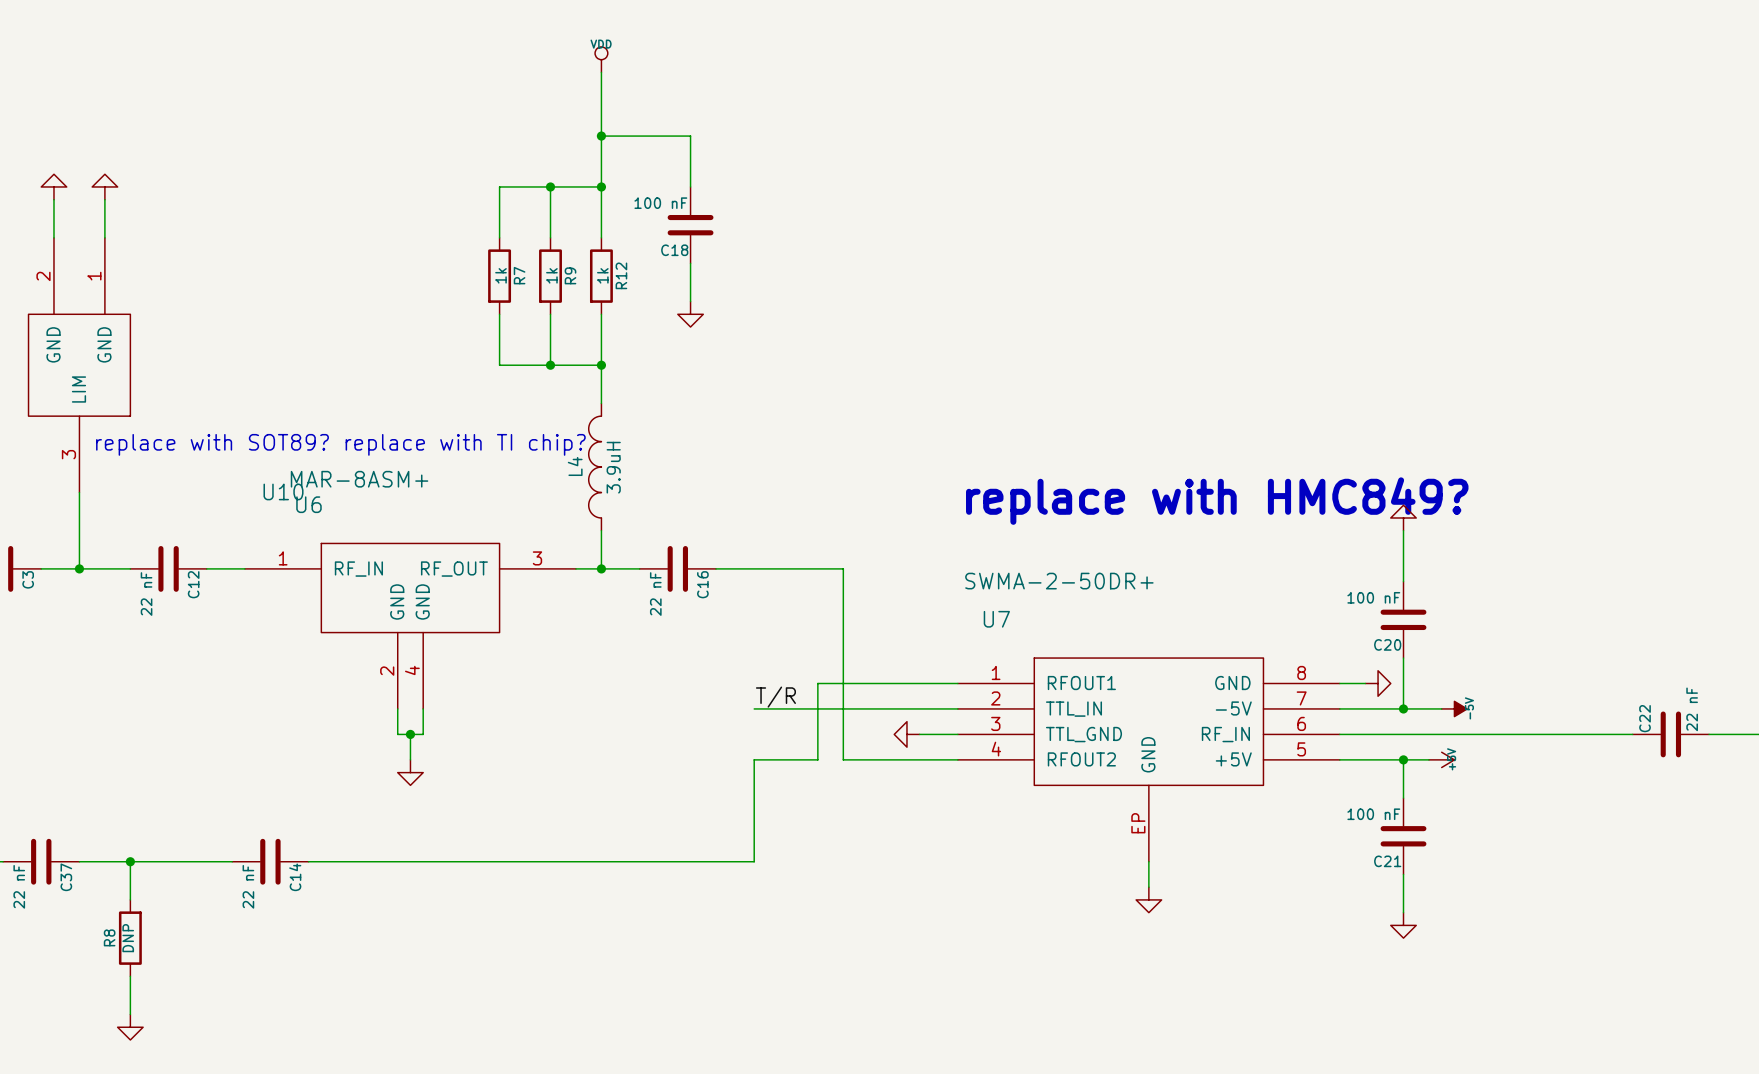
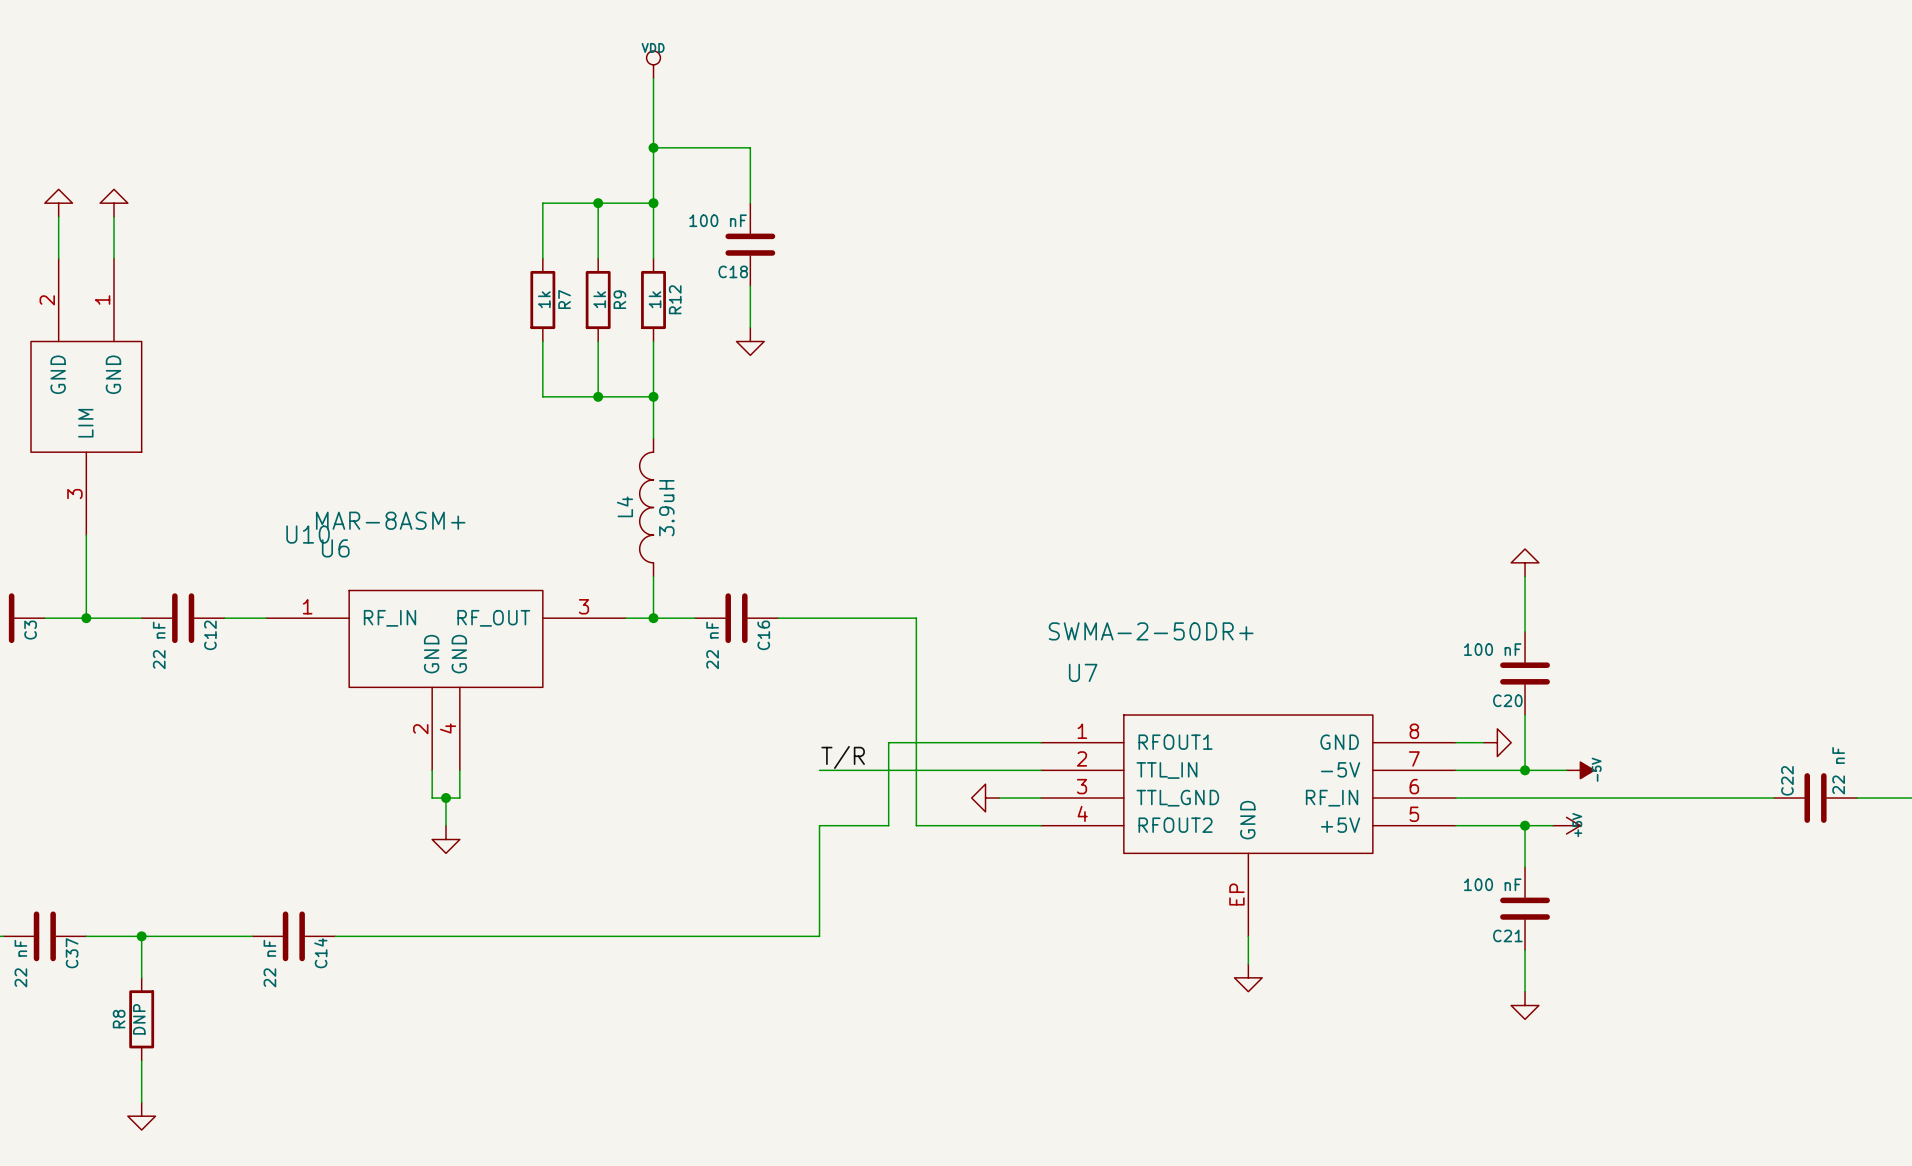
text: replace with SOT89? replace with TI chip? (340, 444) -> none
text: replace with HMC849? (1217, 501) -> none

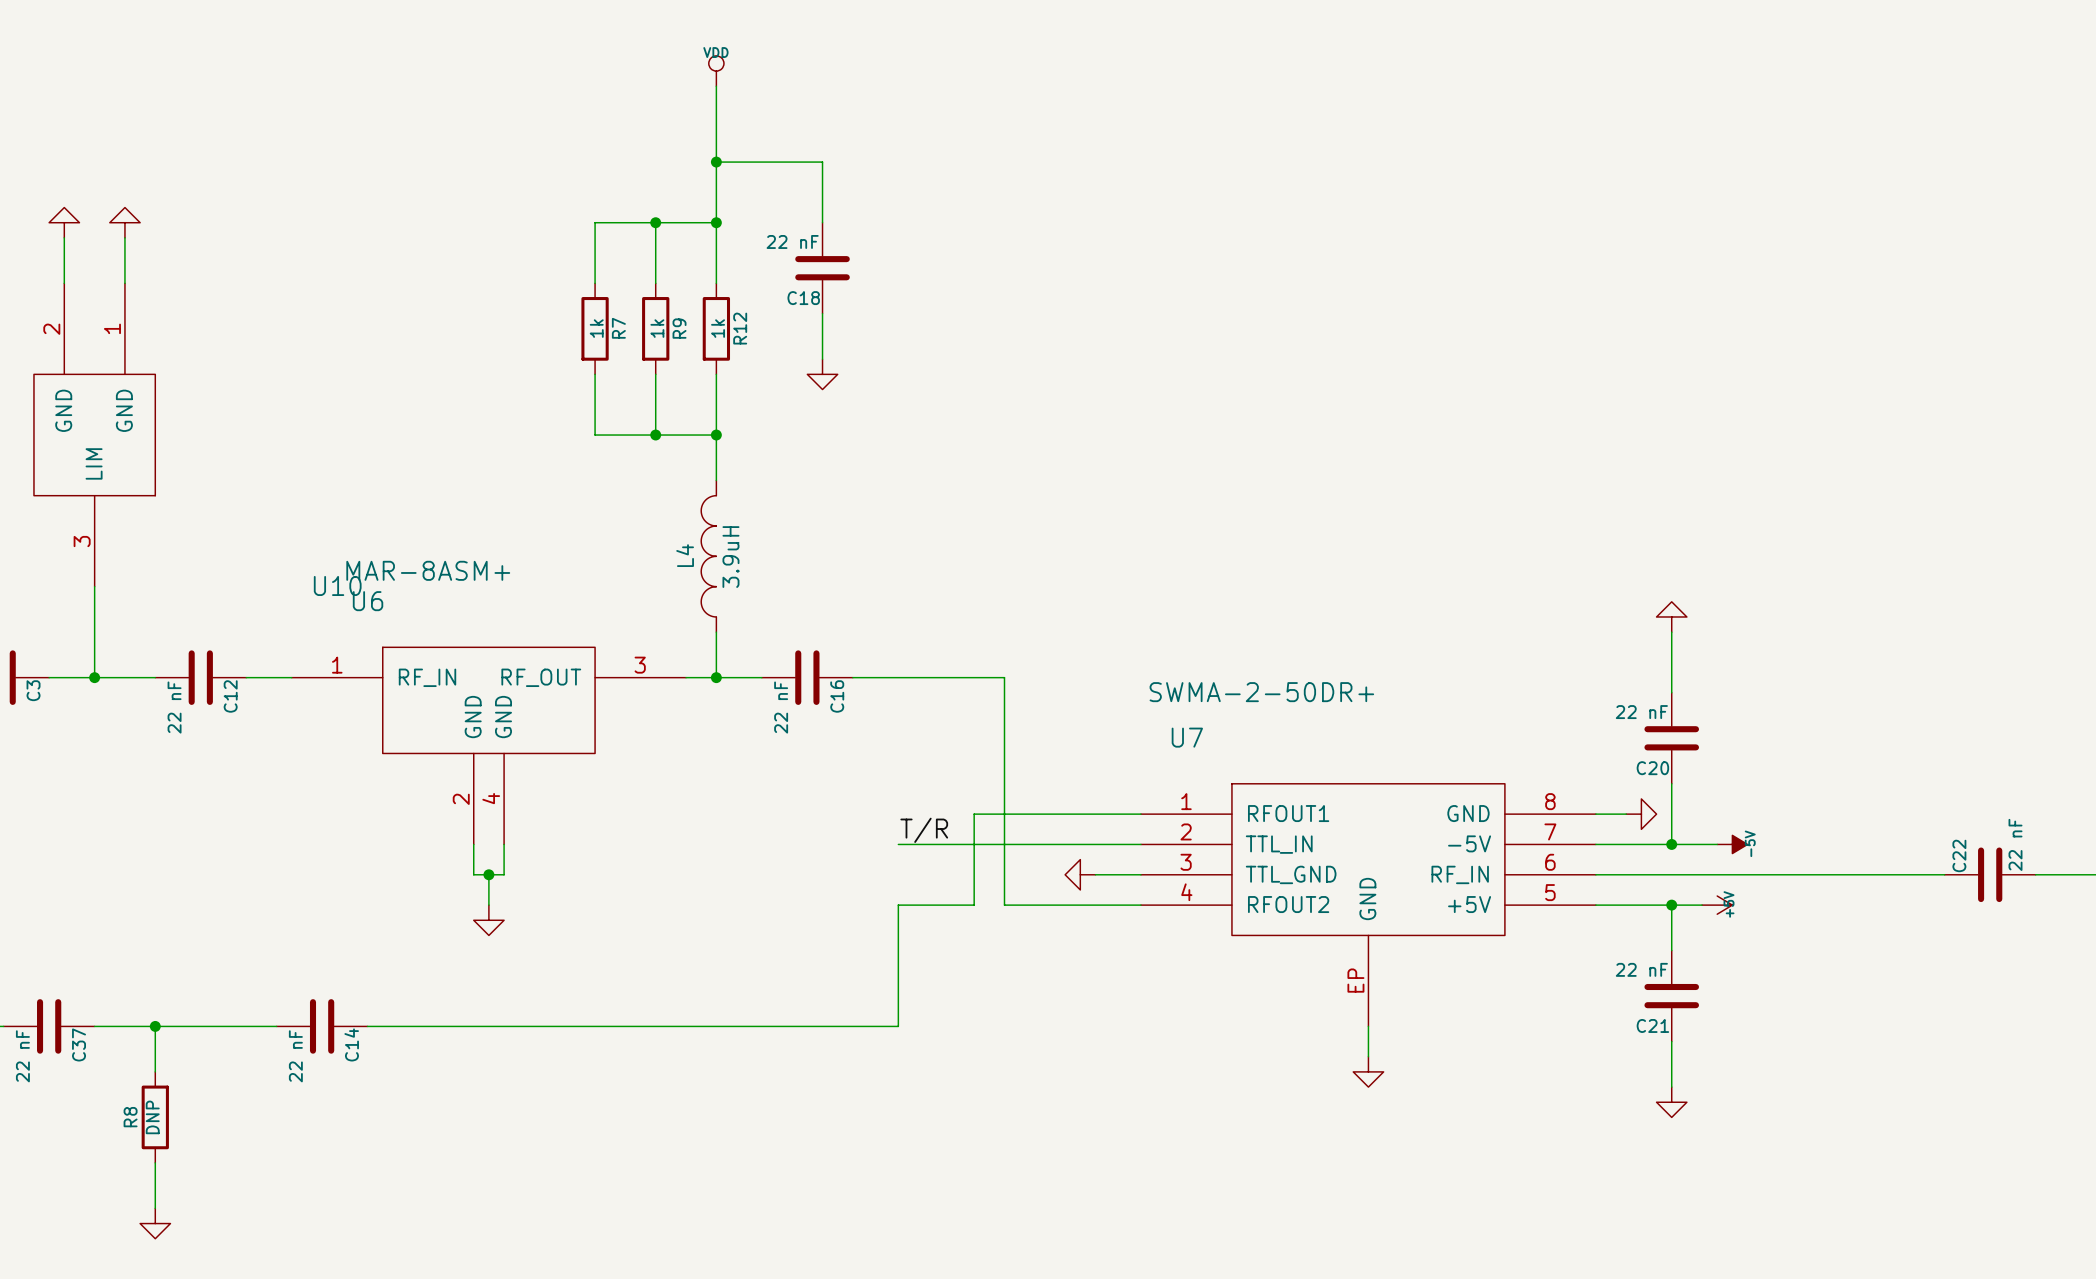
C18 value: 100 nF (718, 220) -> 22 nF (792, 241)
C20 value: 100 nF (1492, 649) -> 22 nF (1641, 712)
C21 value: 100 nF (1492, 884) -> 22 nF (1641, 969)

